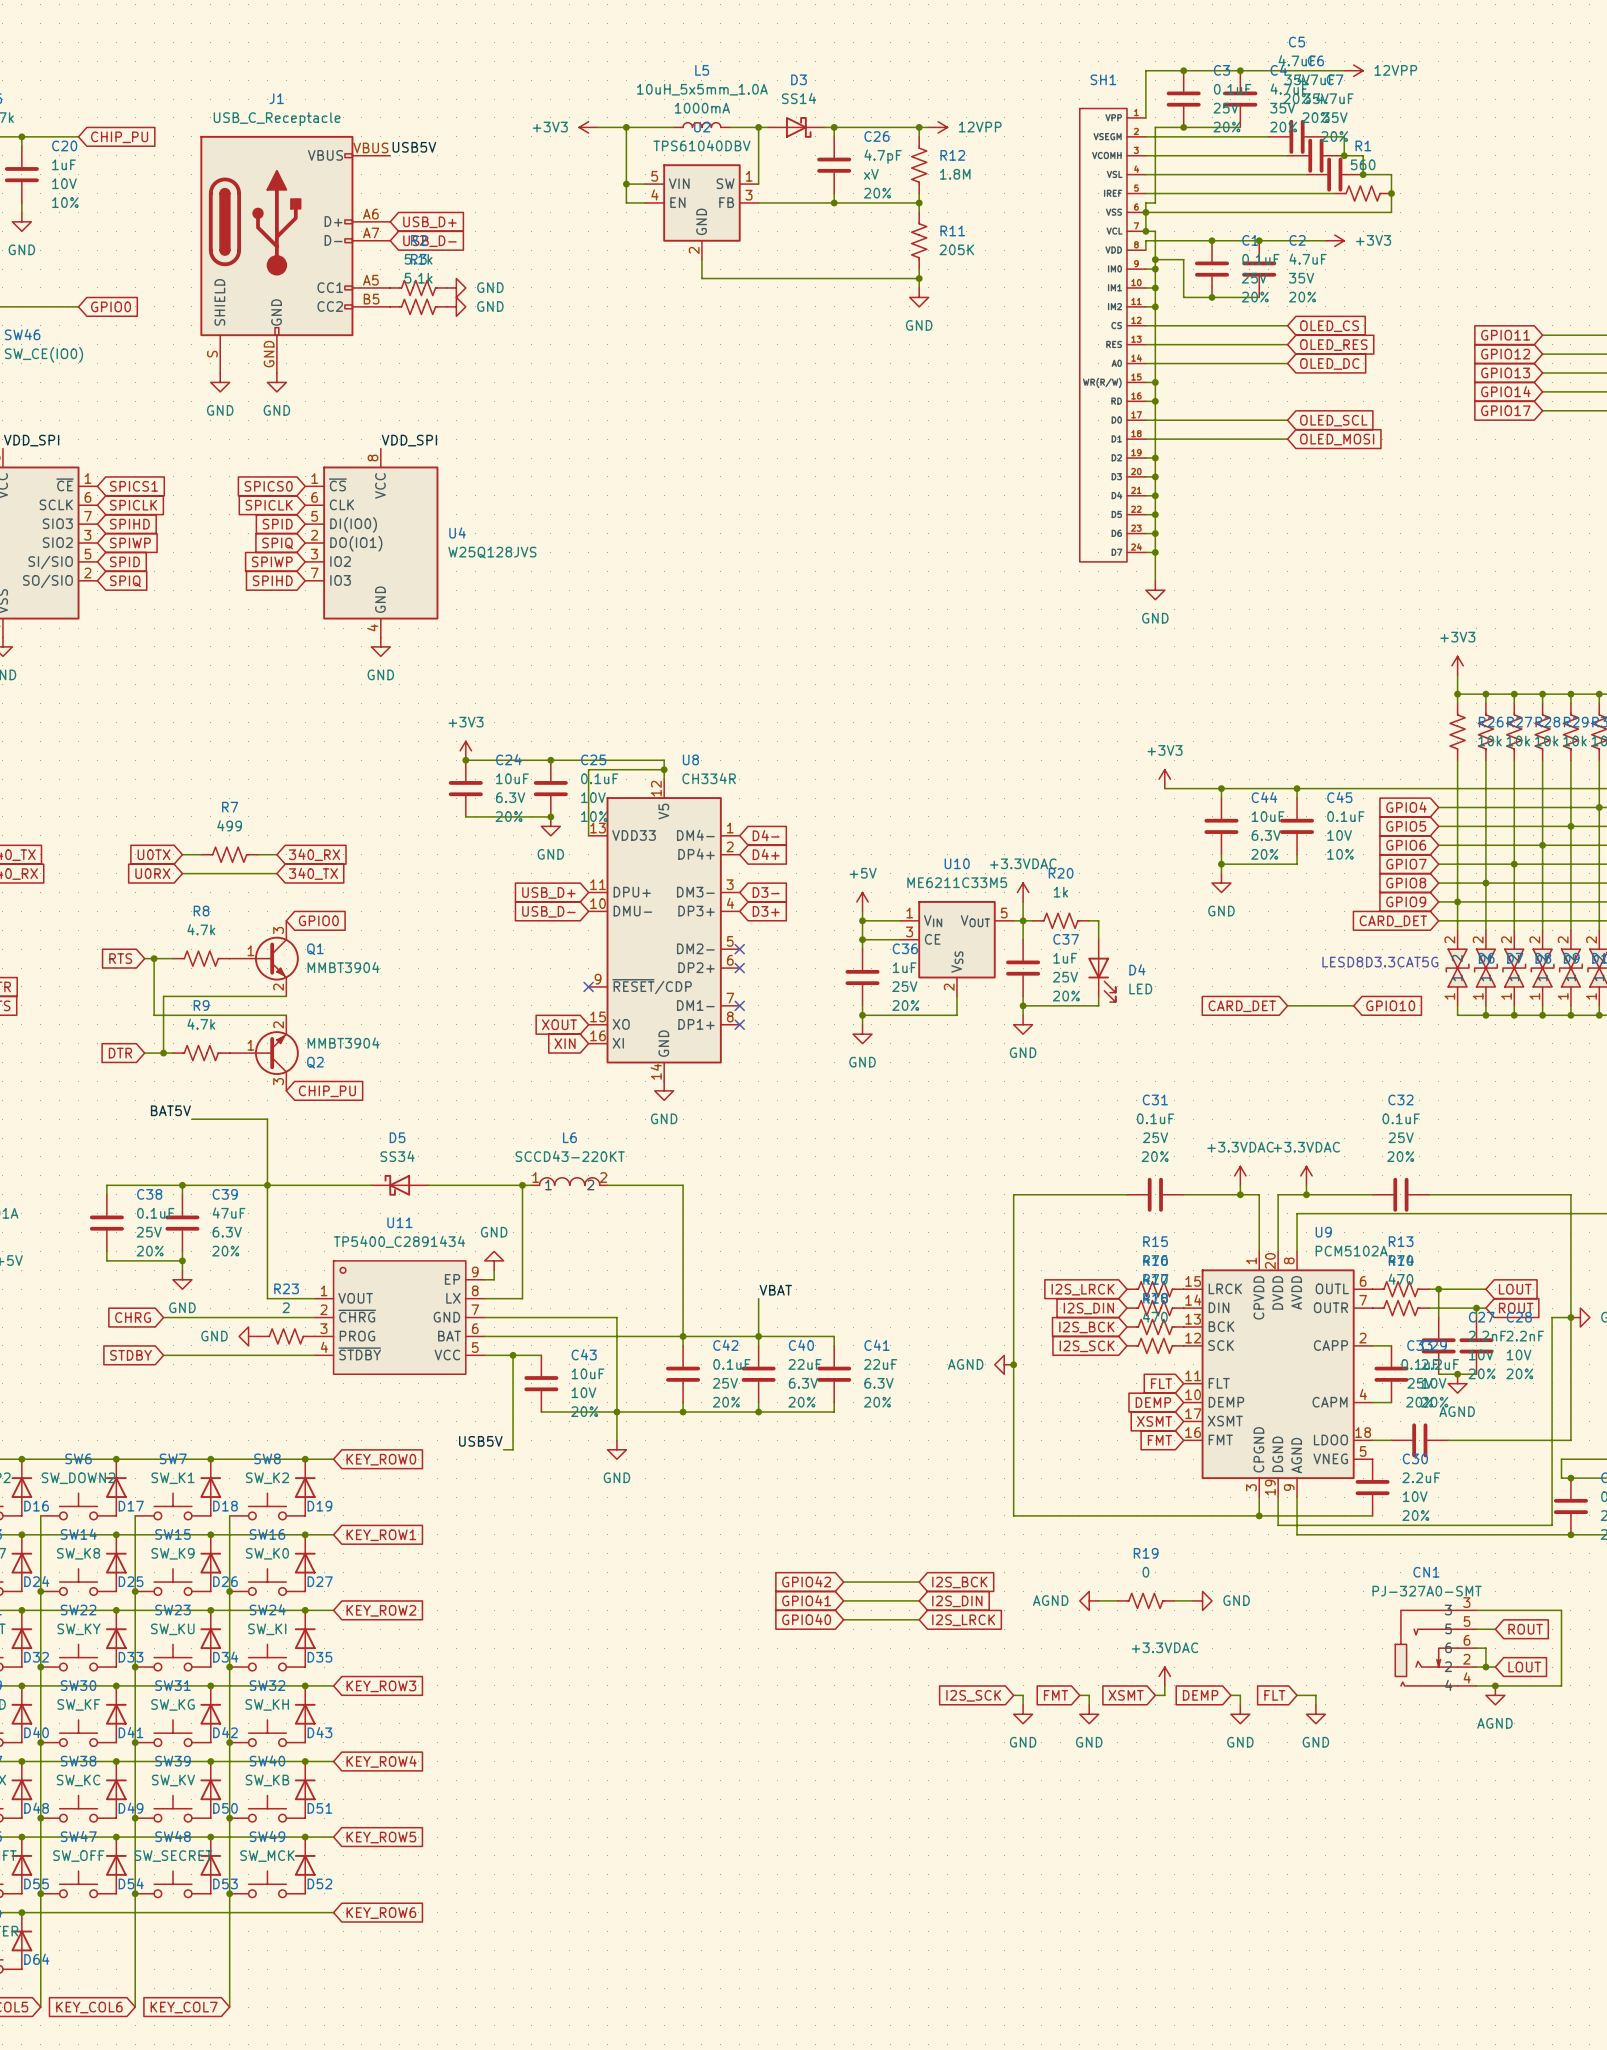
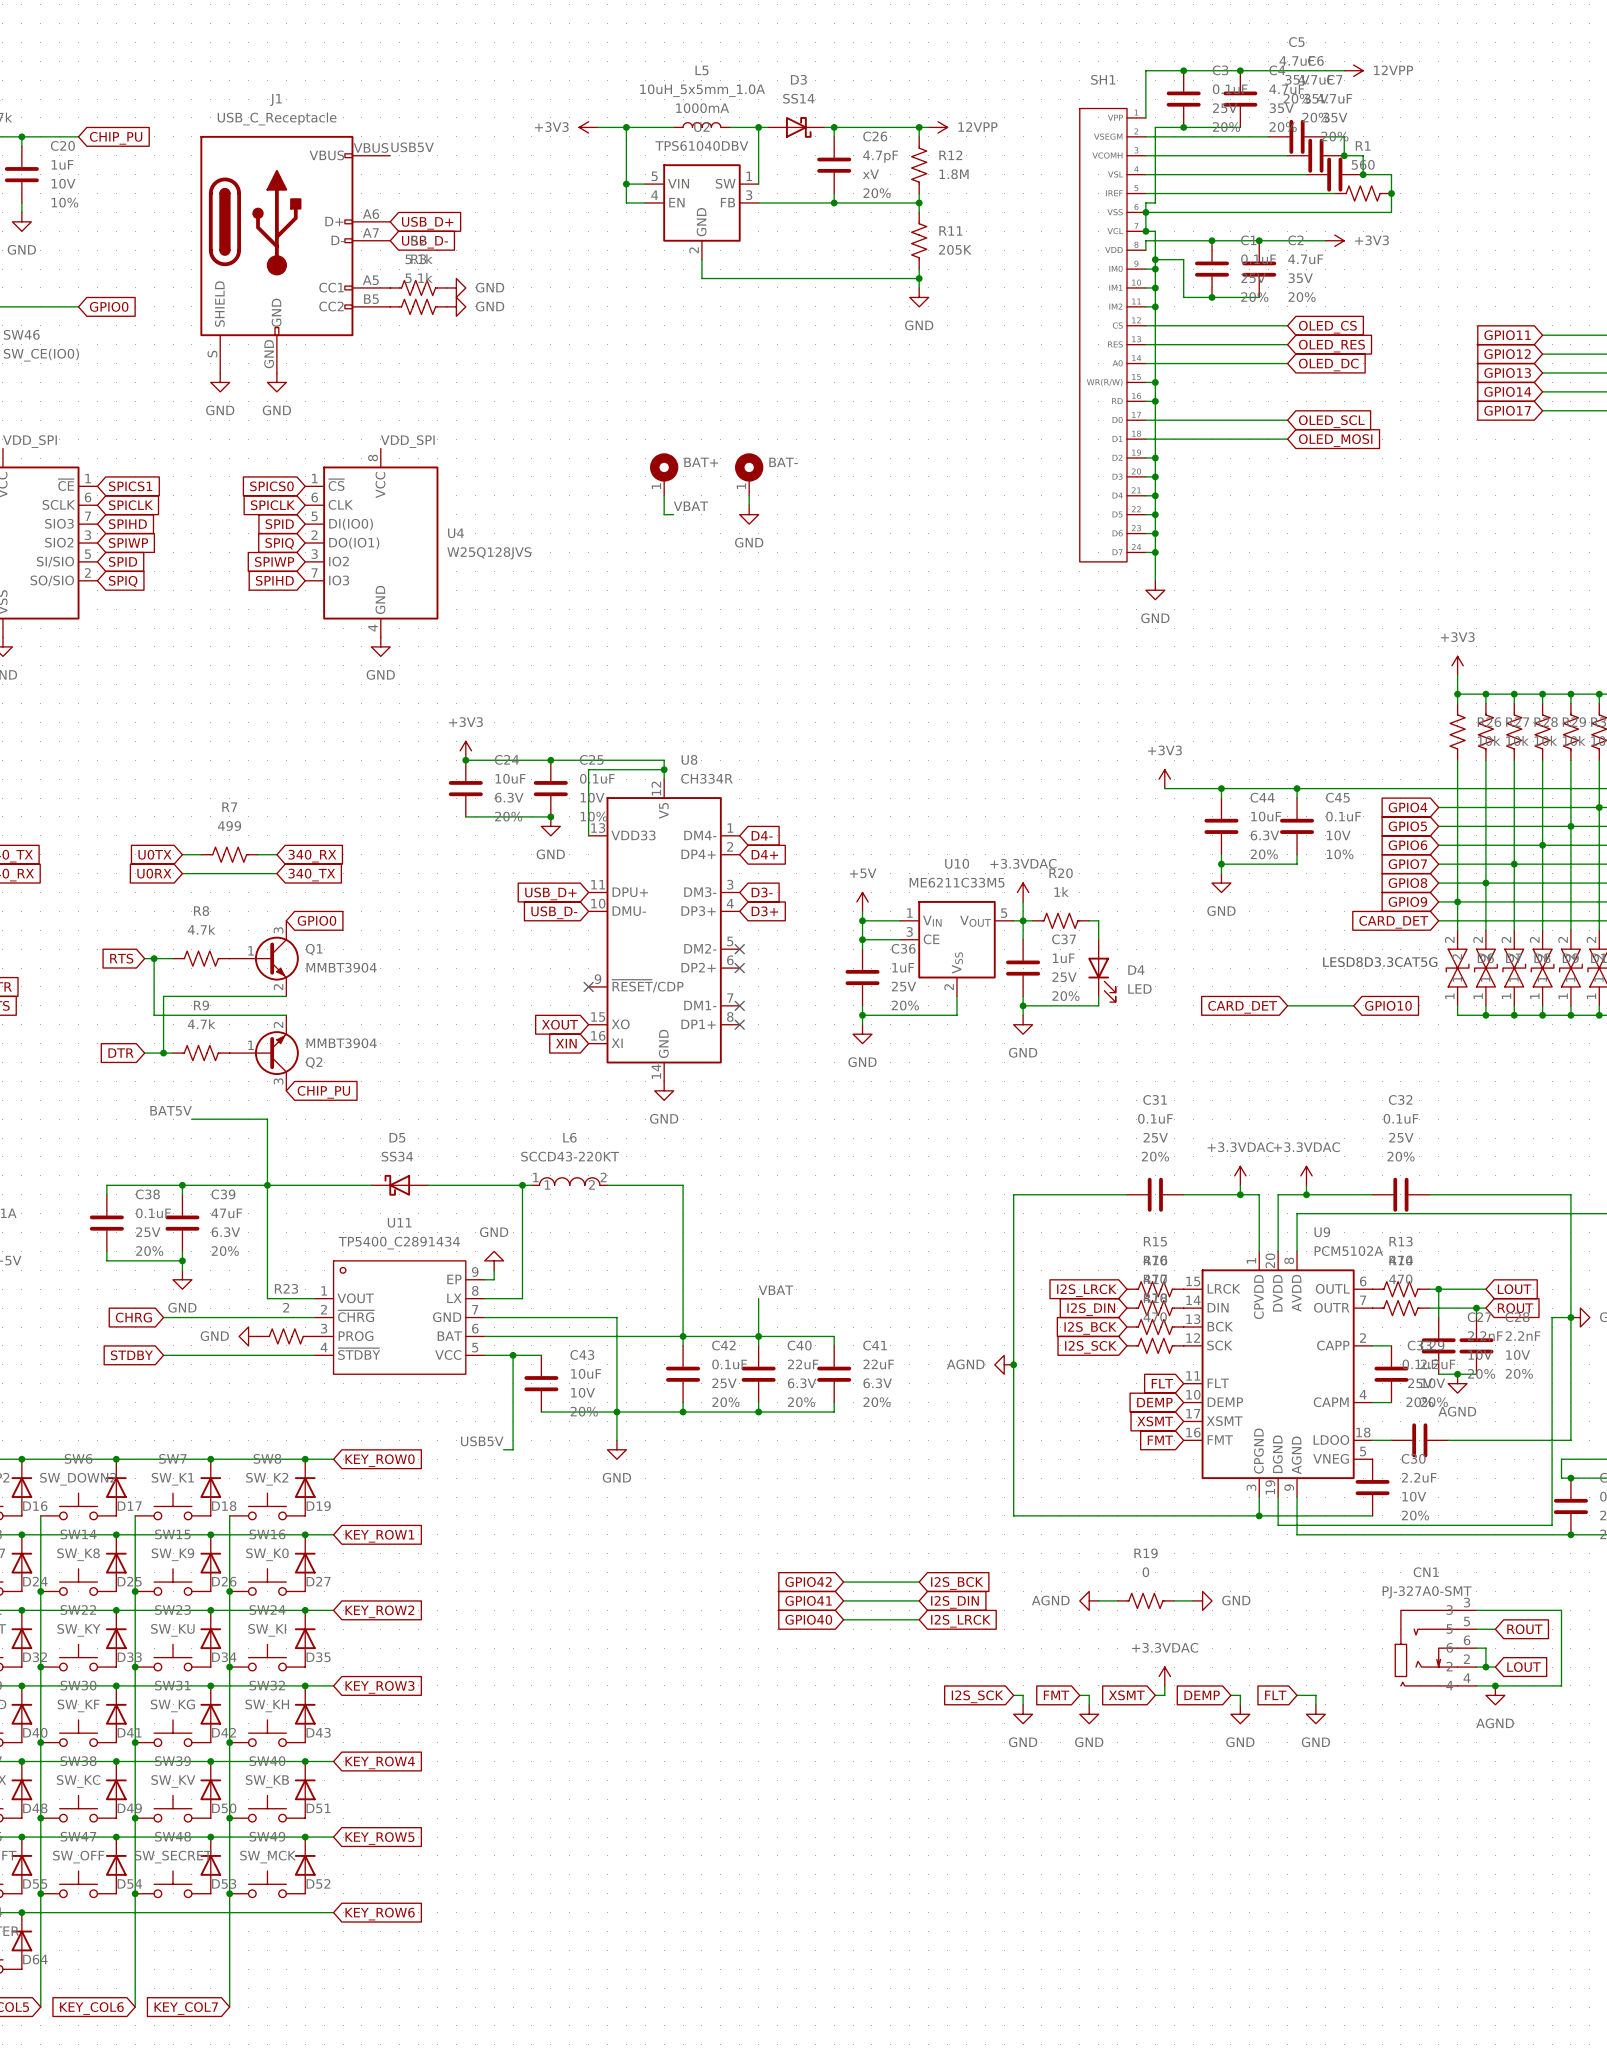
BAT+: none -> (664, 474)
BAT-: none -> (749, 474)
wire: none -> (664, 495) (664, 514) (673, 514)
wire: none -> (749, 495) (749, 505)
label: none -> VBAT (690, 506)
power symbol: none -> GND (749, 514)

